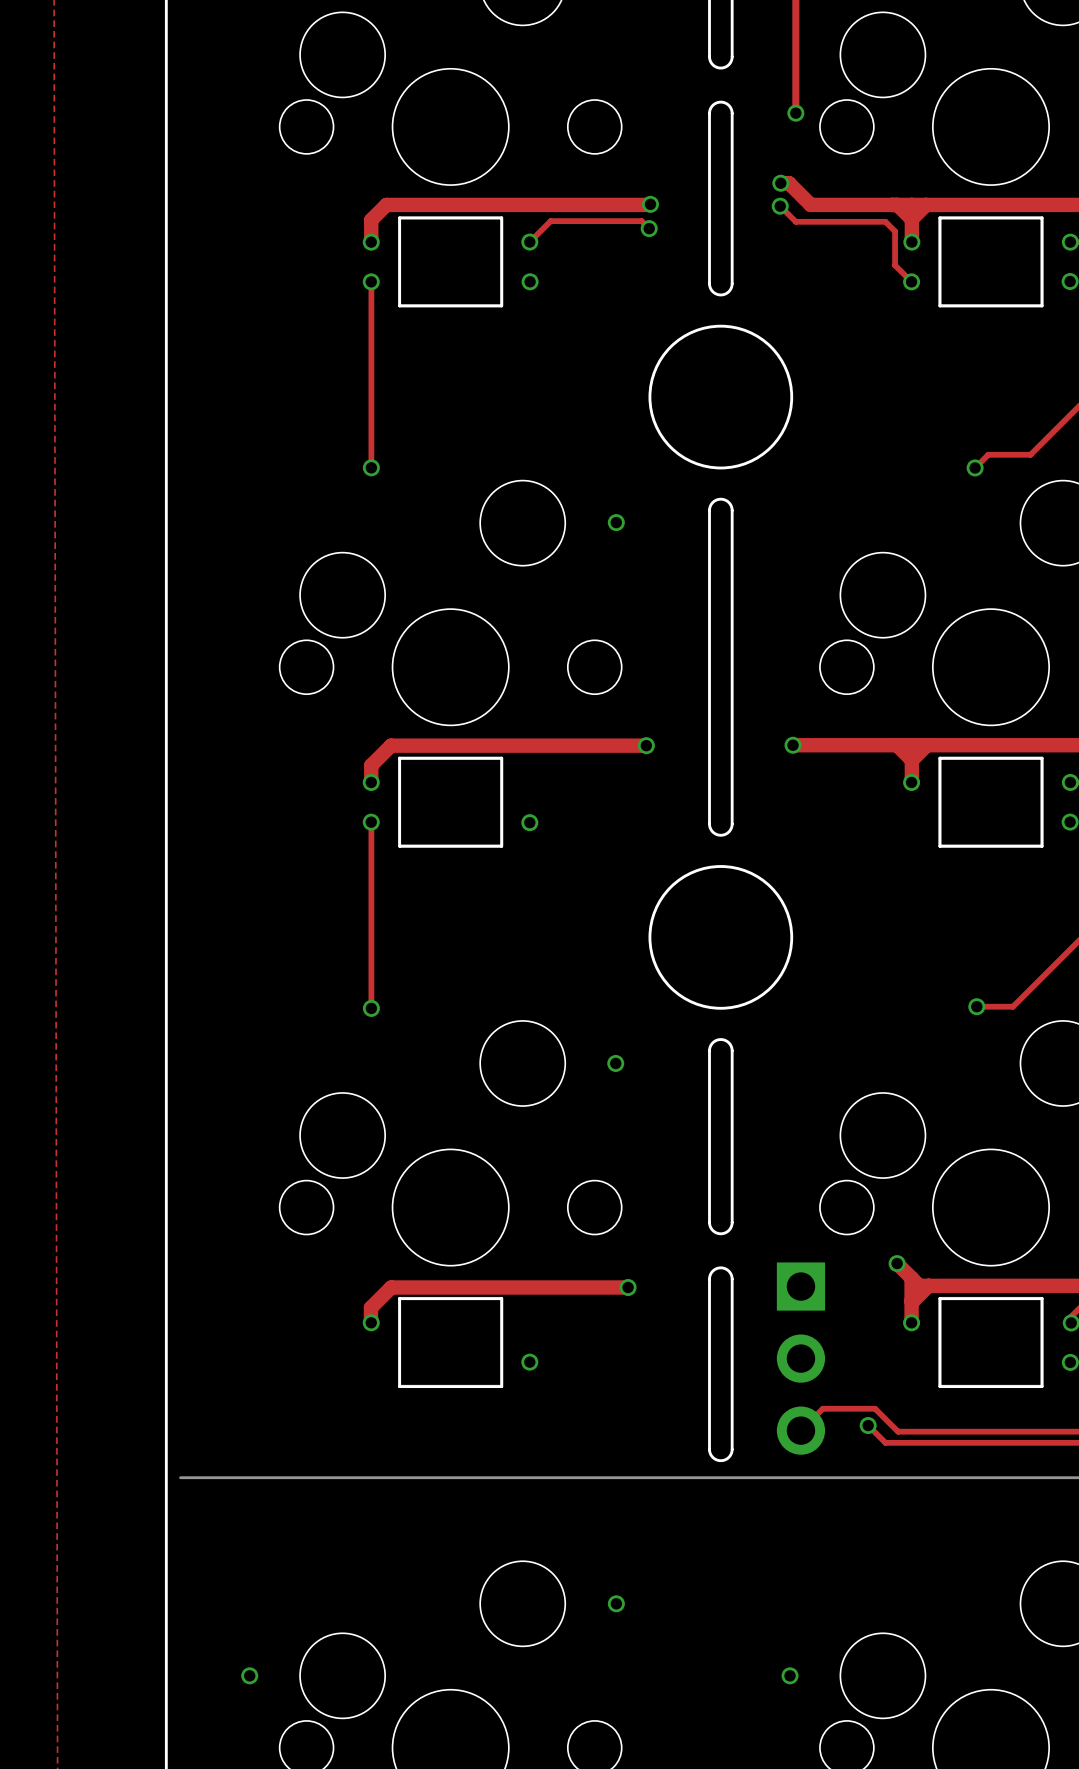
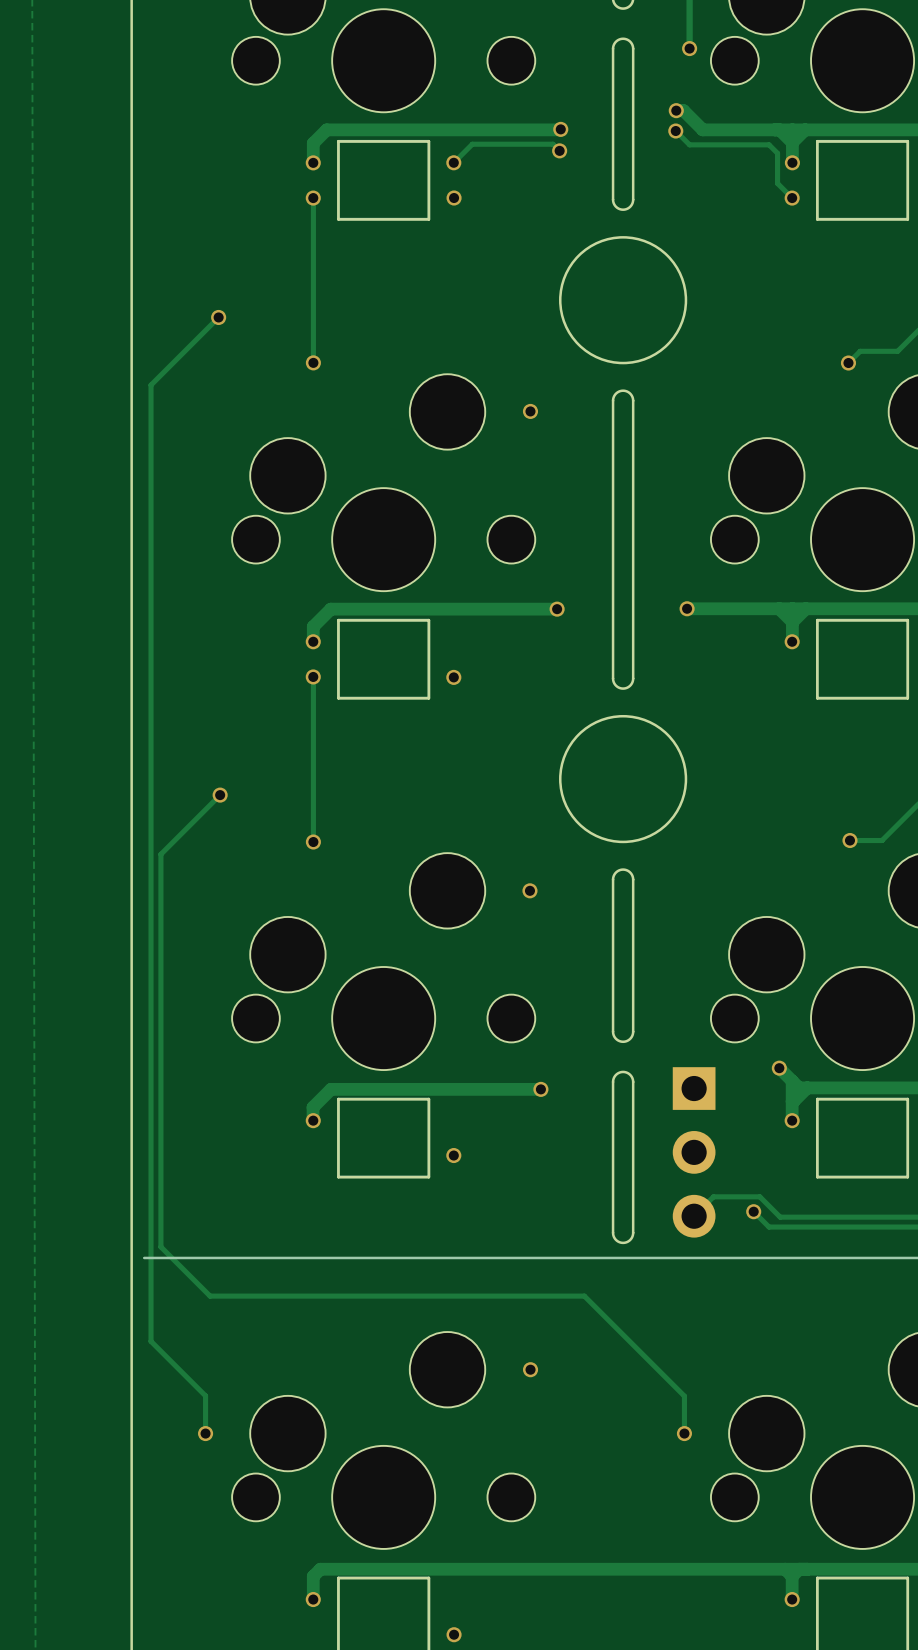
track: none -> (218, 317) (151, 385) (151, 1341) (205, 1395) (205, 1433)
via: none -> (218, 317)
track: none -> (220, 795) (160, 854) (160, 1246) (210, 1296) (584, 1296) (684, 1396) (684, 1433)
via: none -> (220, 795)

